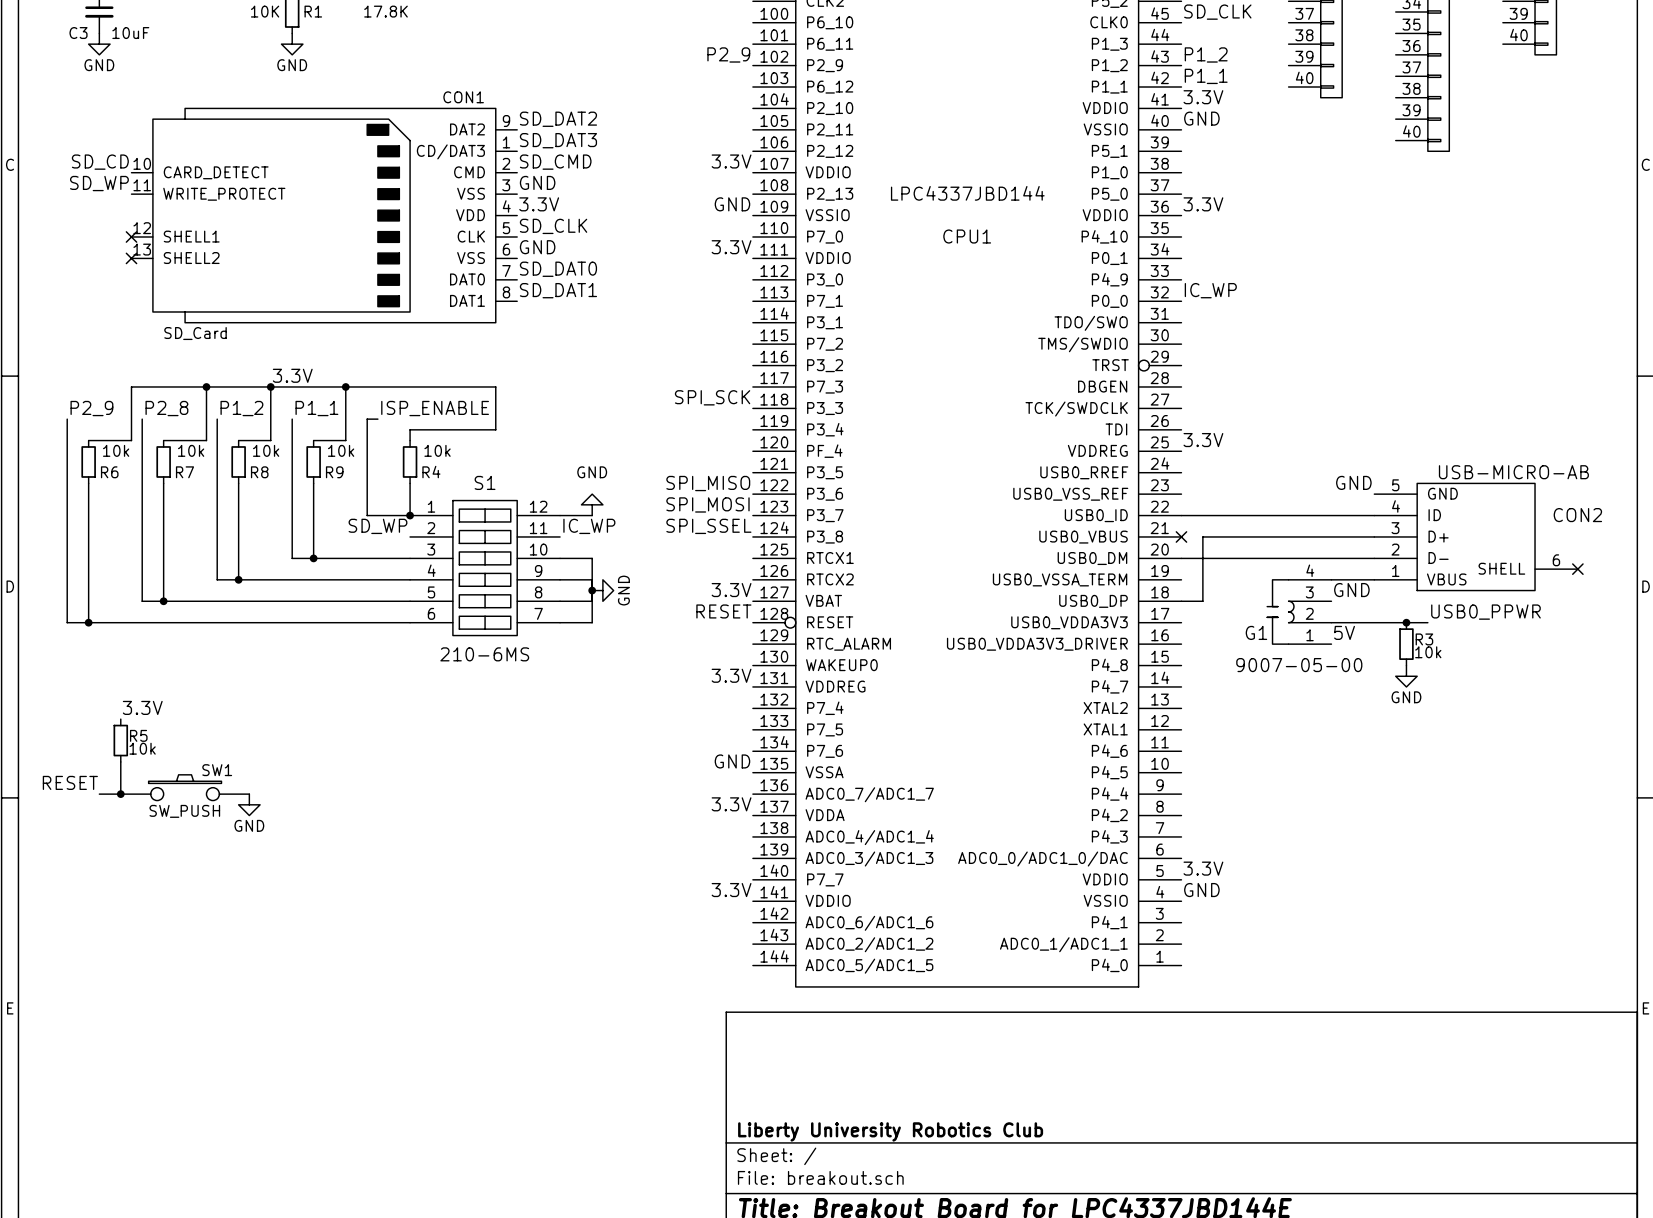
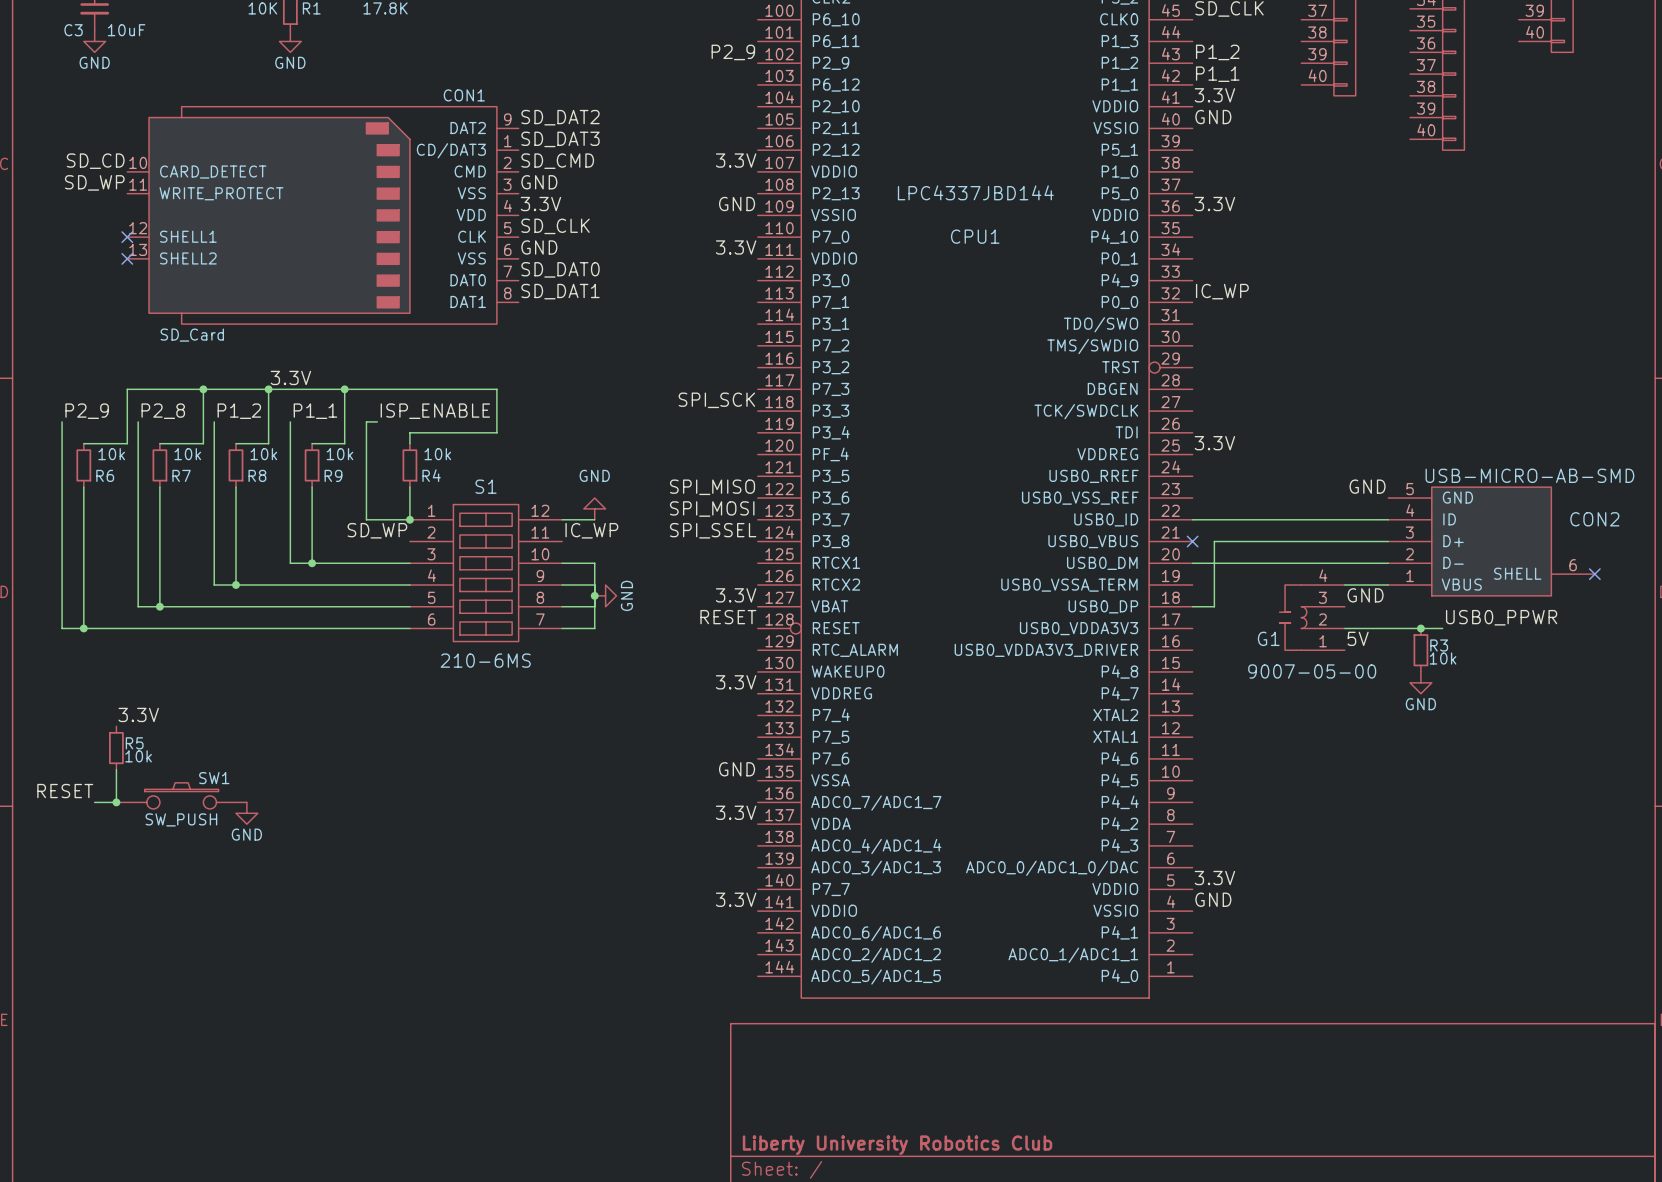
CON2 value: USB-MICRO-AB (1513, 472) -> USB-MICRO-AB-SMD (1529, 475)

